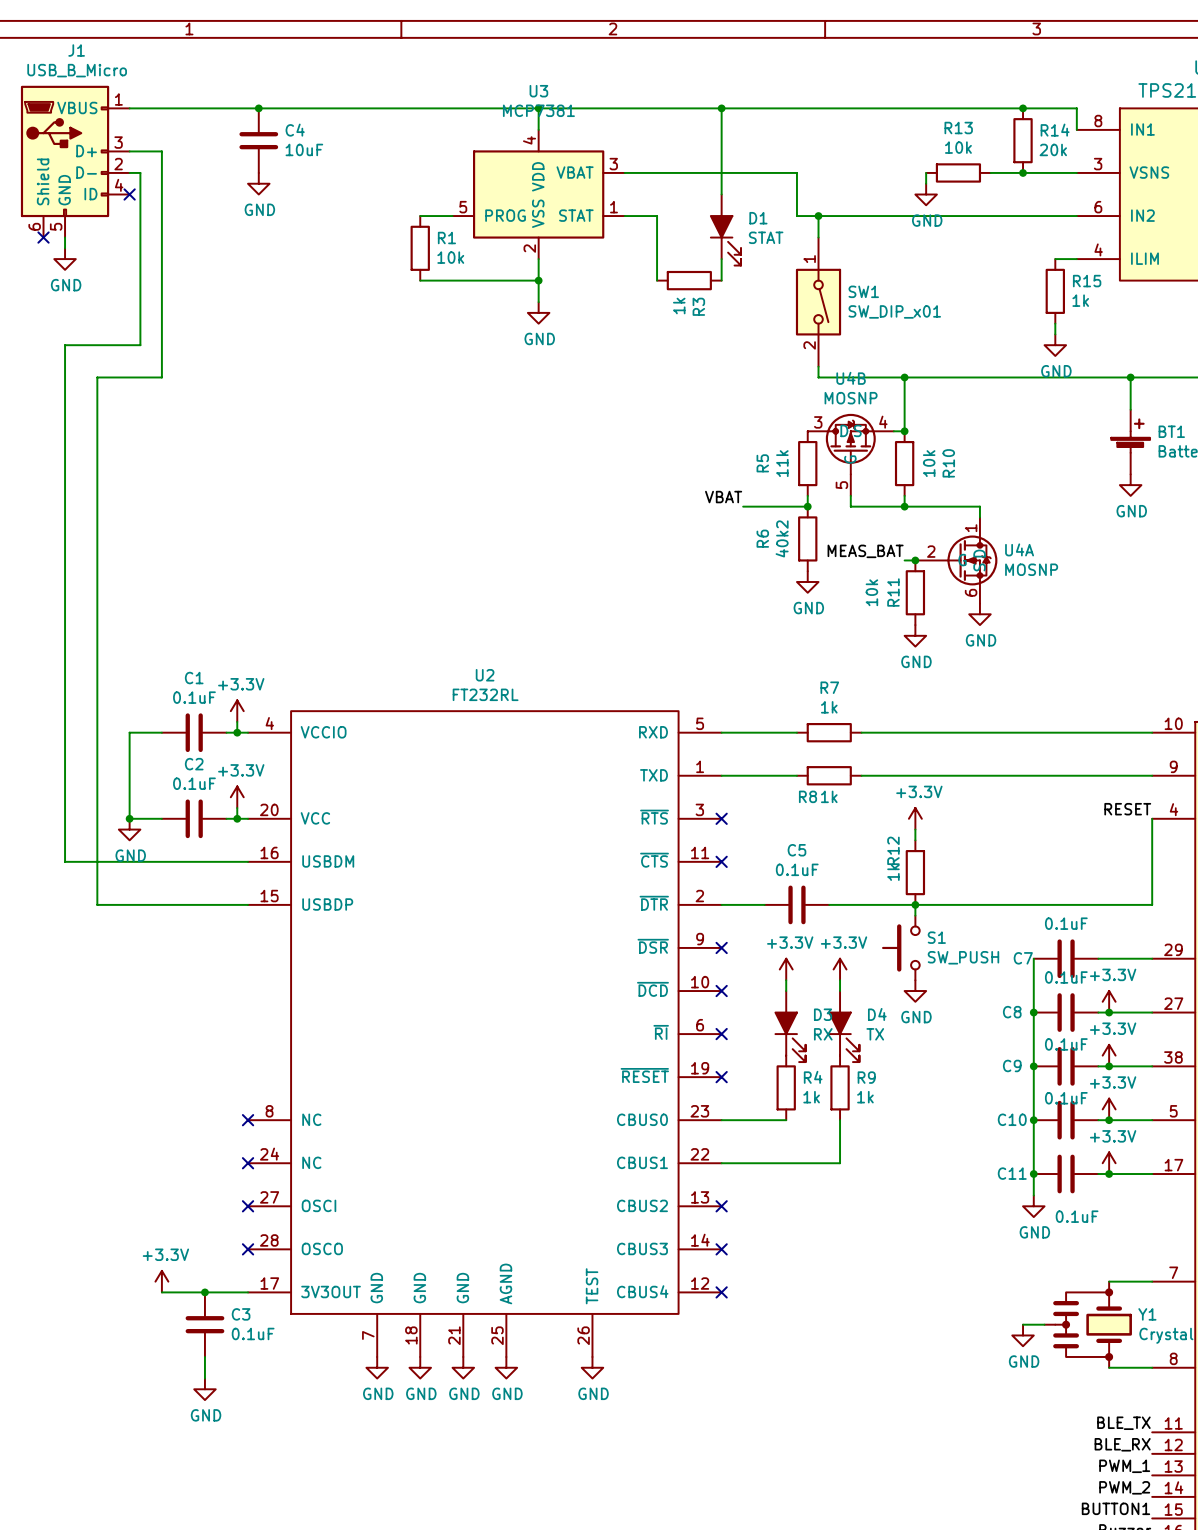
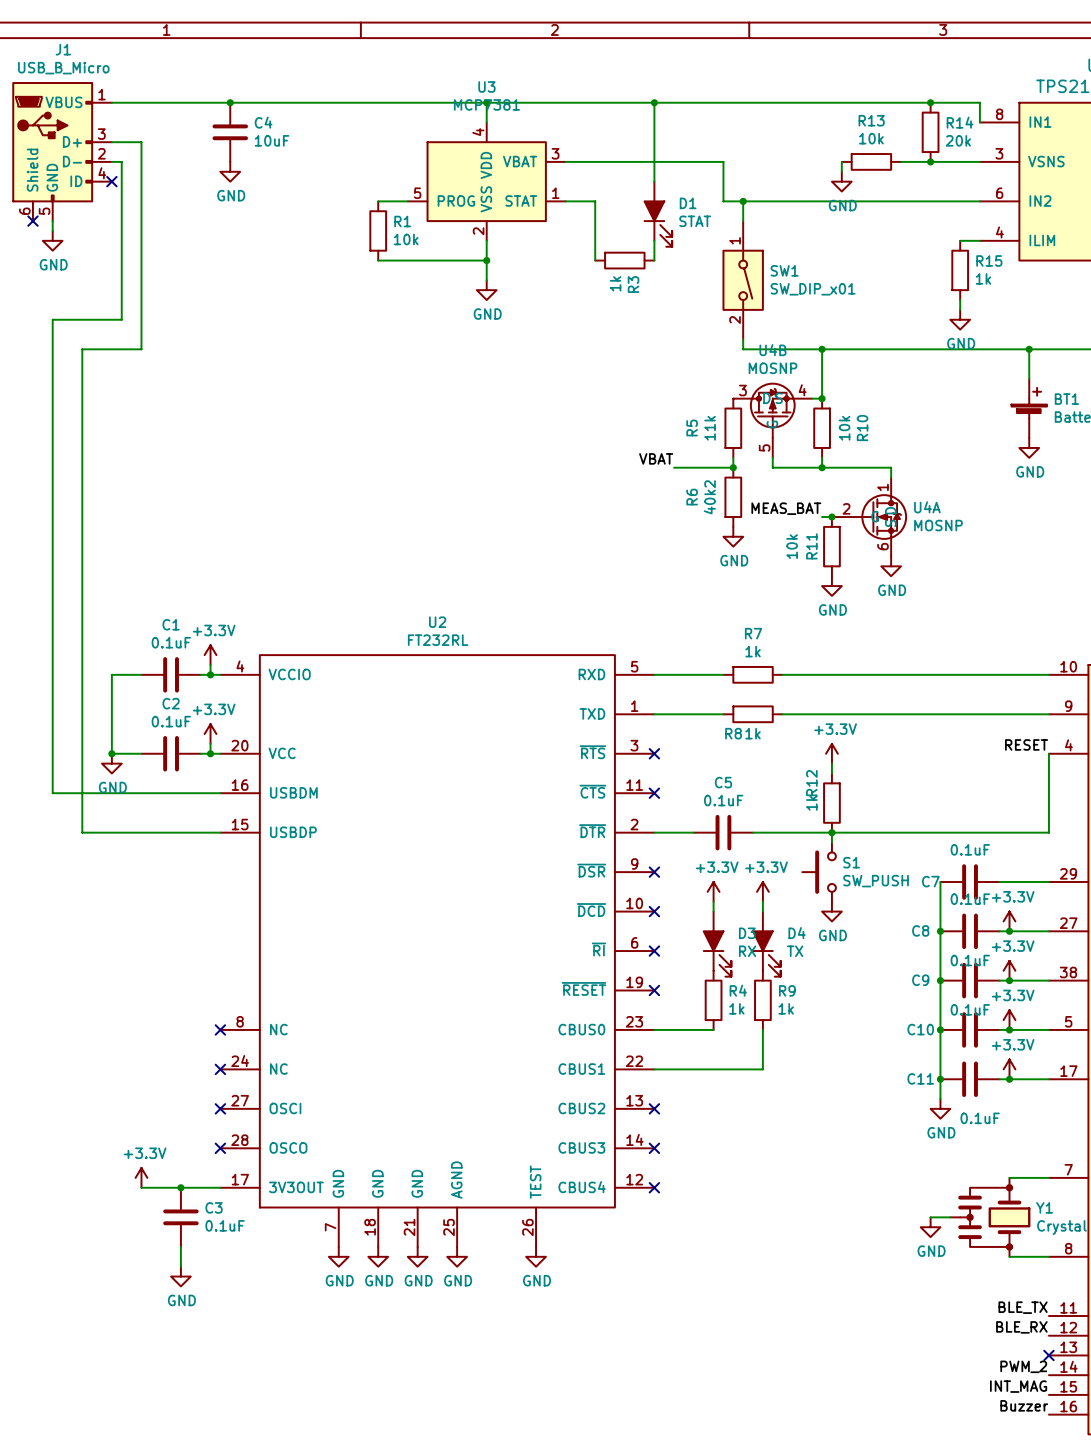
label: PWM_1 (1124, 1466) -> none
no-connect mark: none -> (1048, 1355)
label: BUTTON1 (1115, 1508) -> INT_MAG (1018, 1386)

